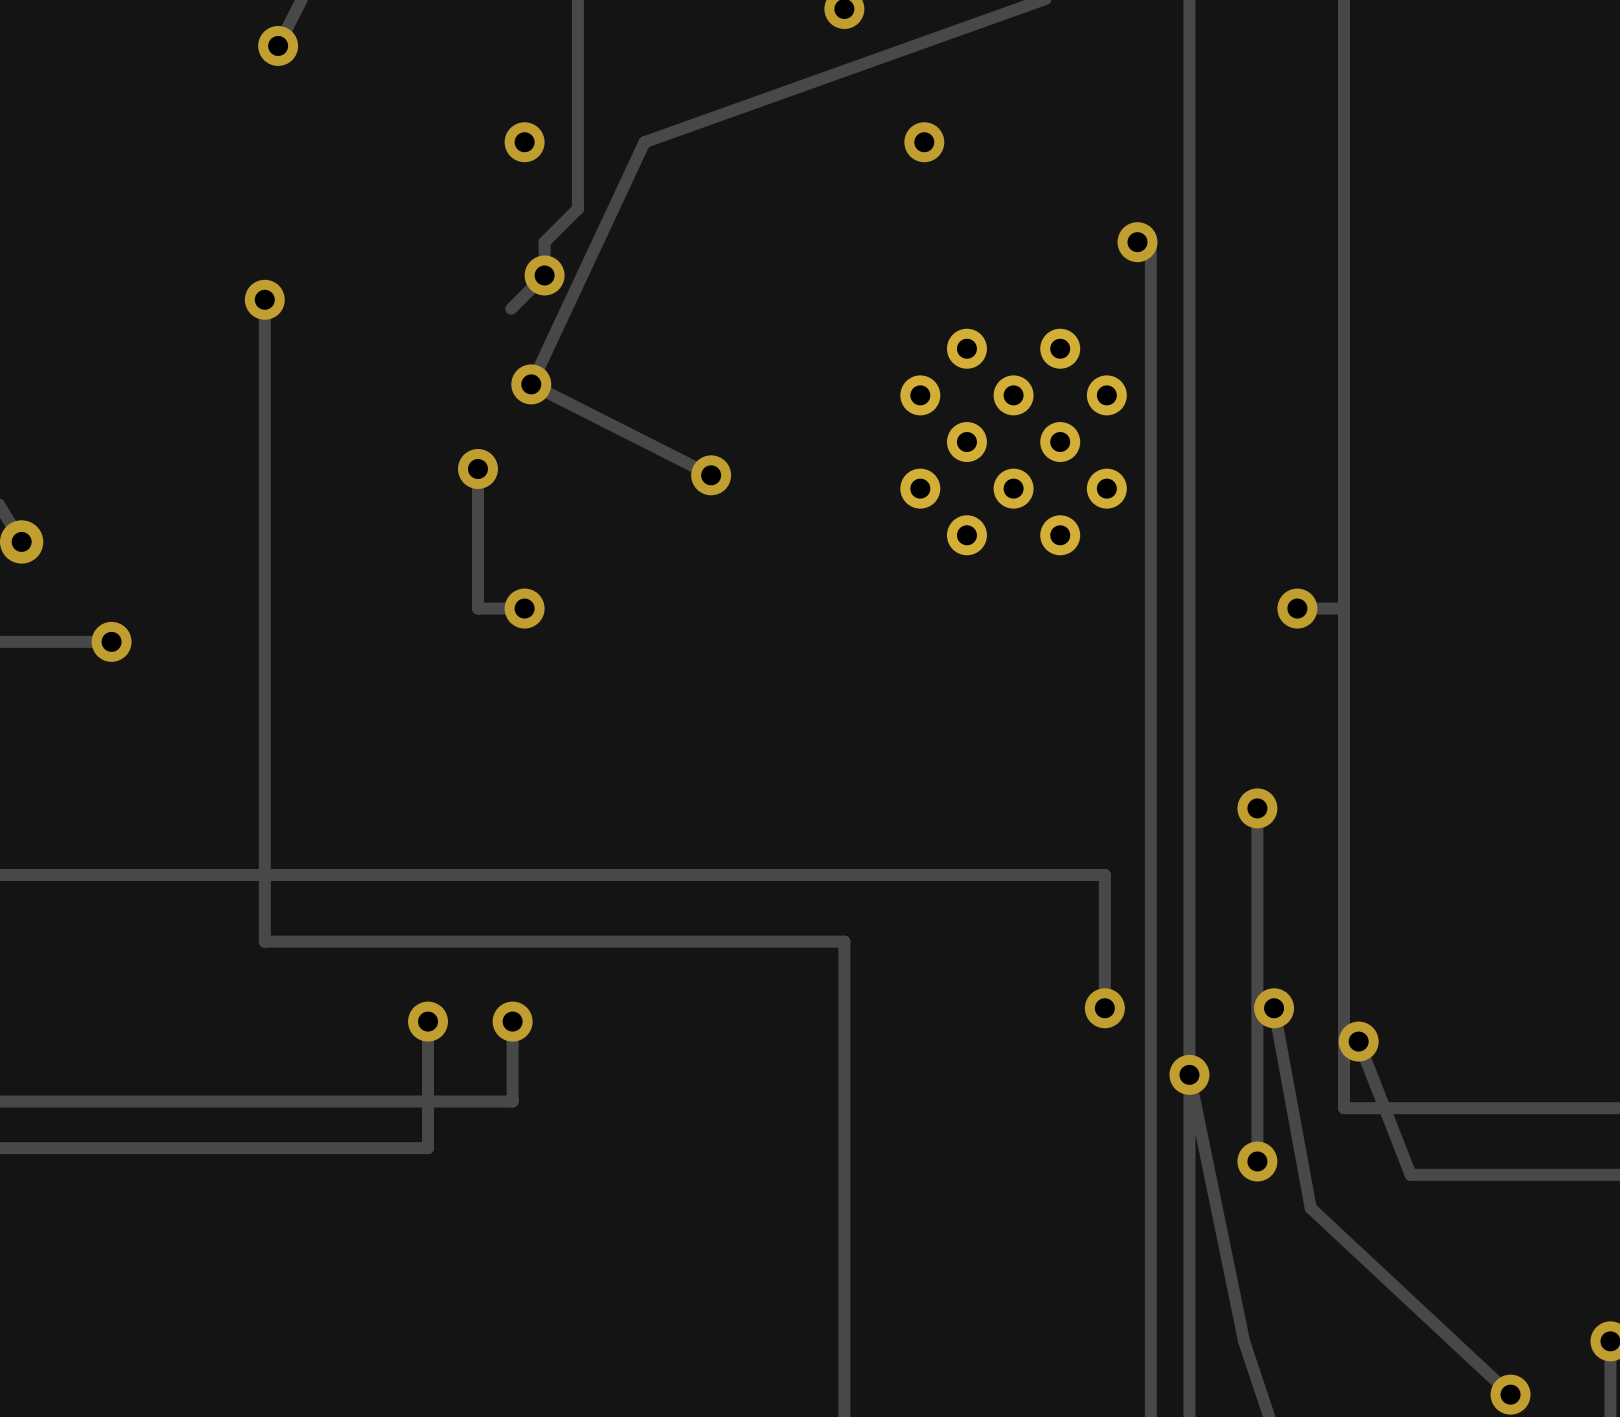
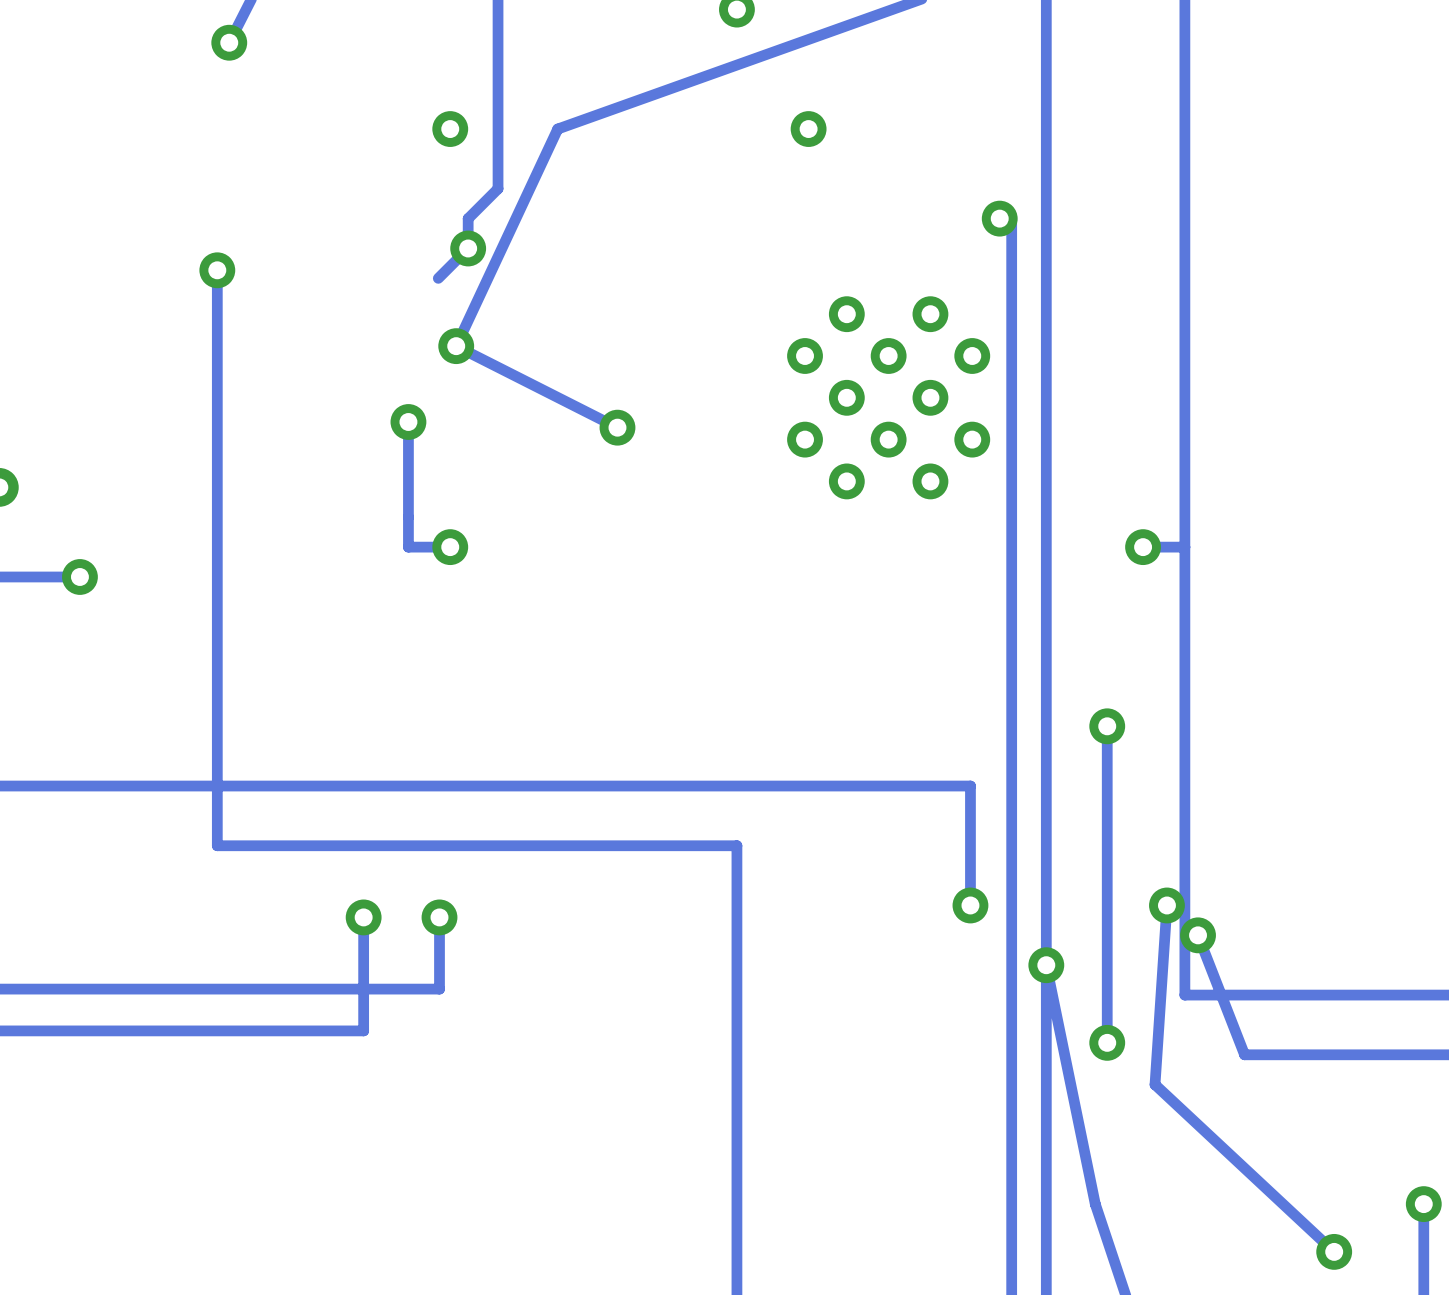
track: (1274, 1008) (1310, 1208) -> (1166, 905) (1155, 1084)
via position: (1274, 1008) -> (1166, 905)

